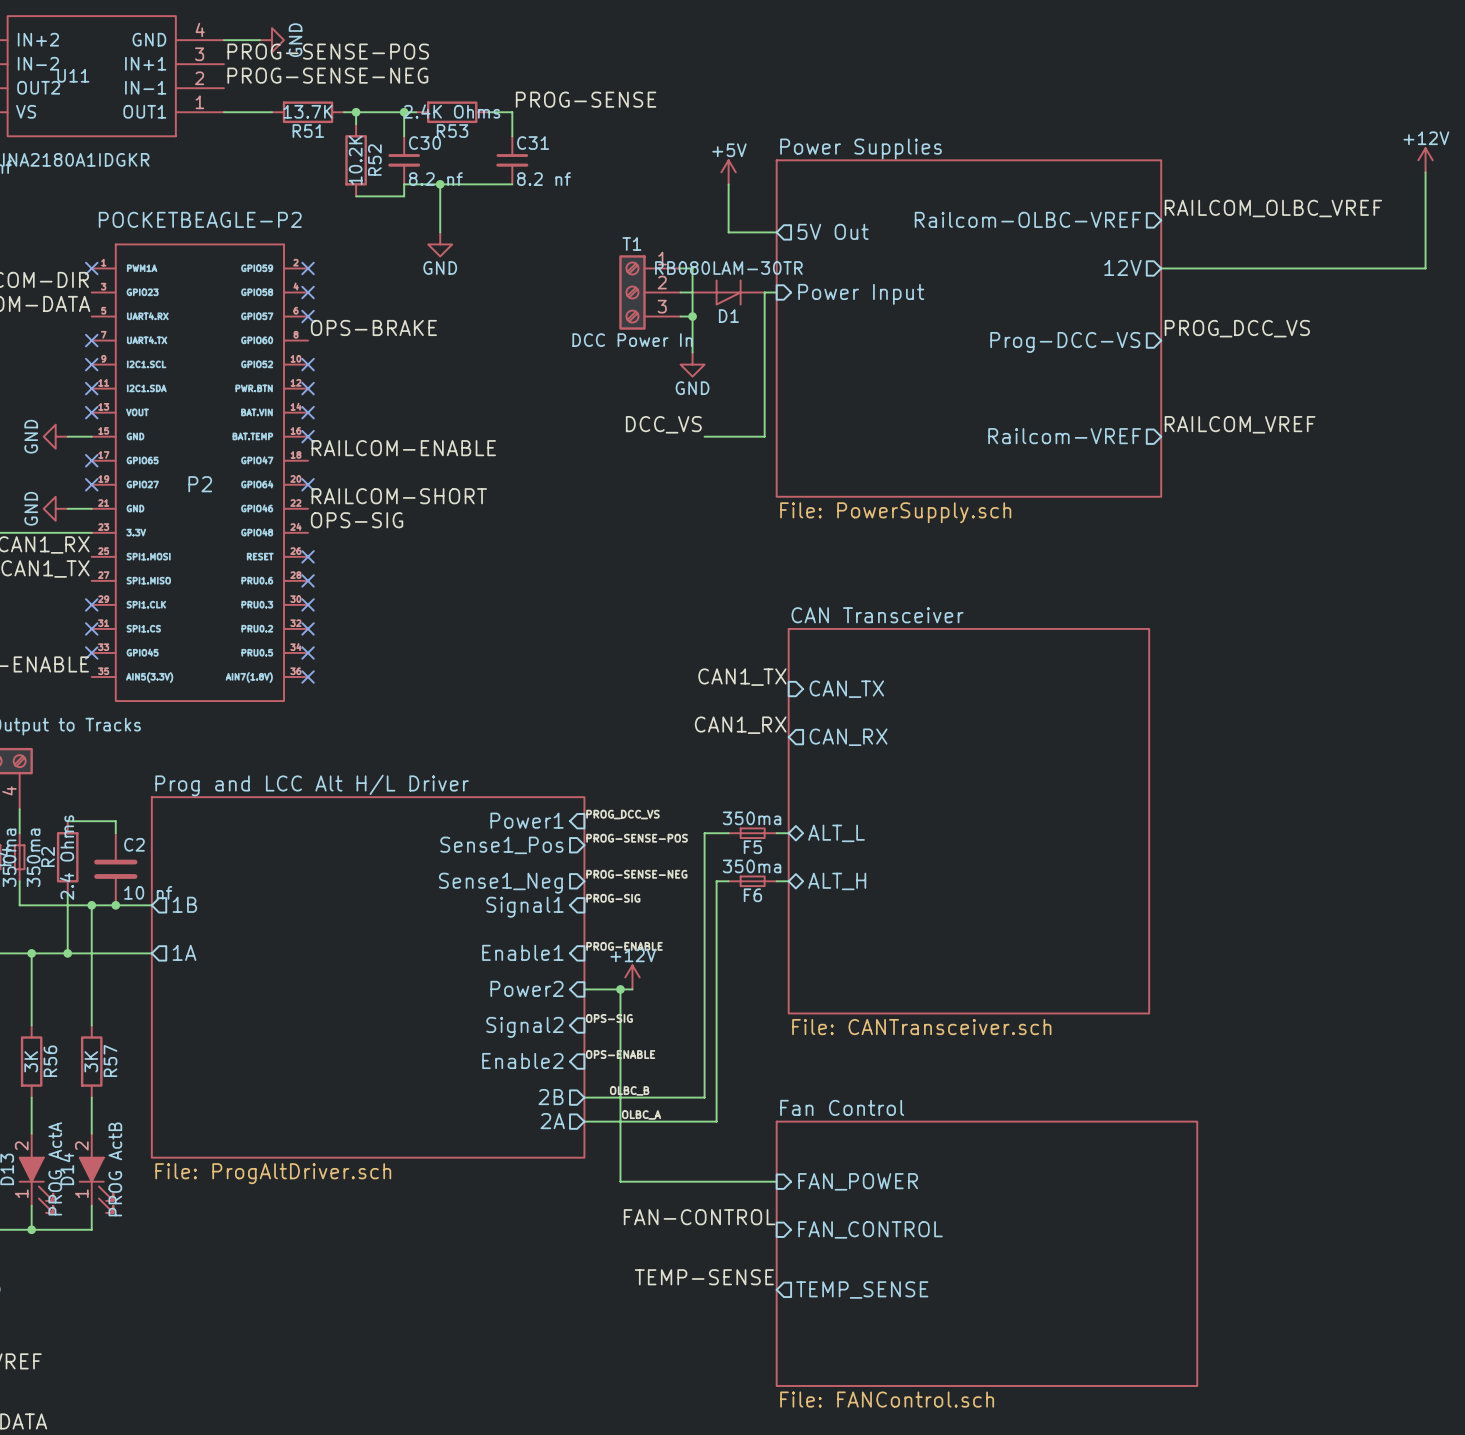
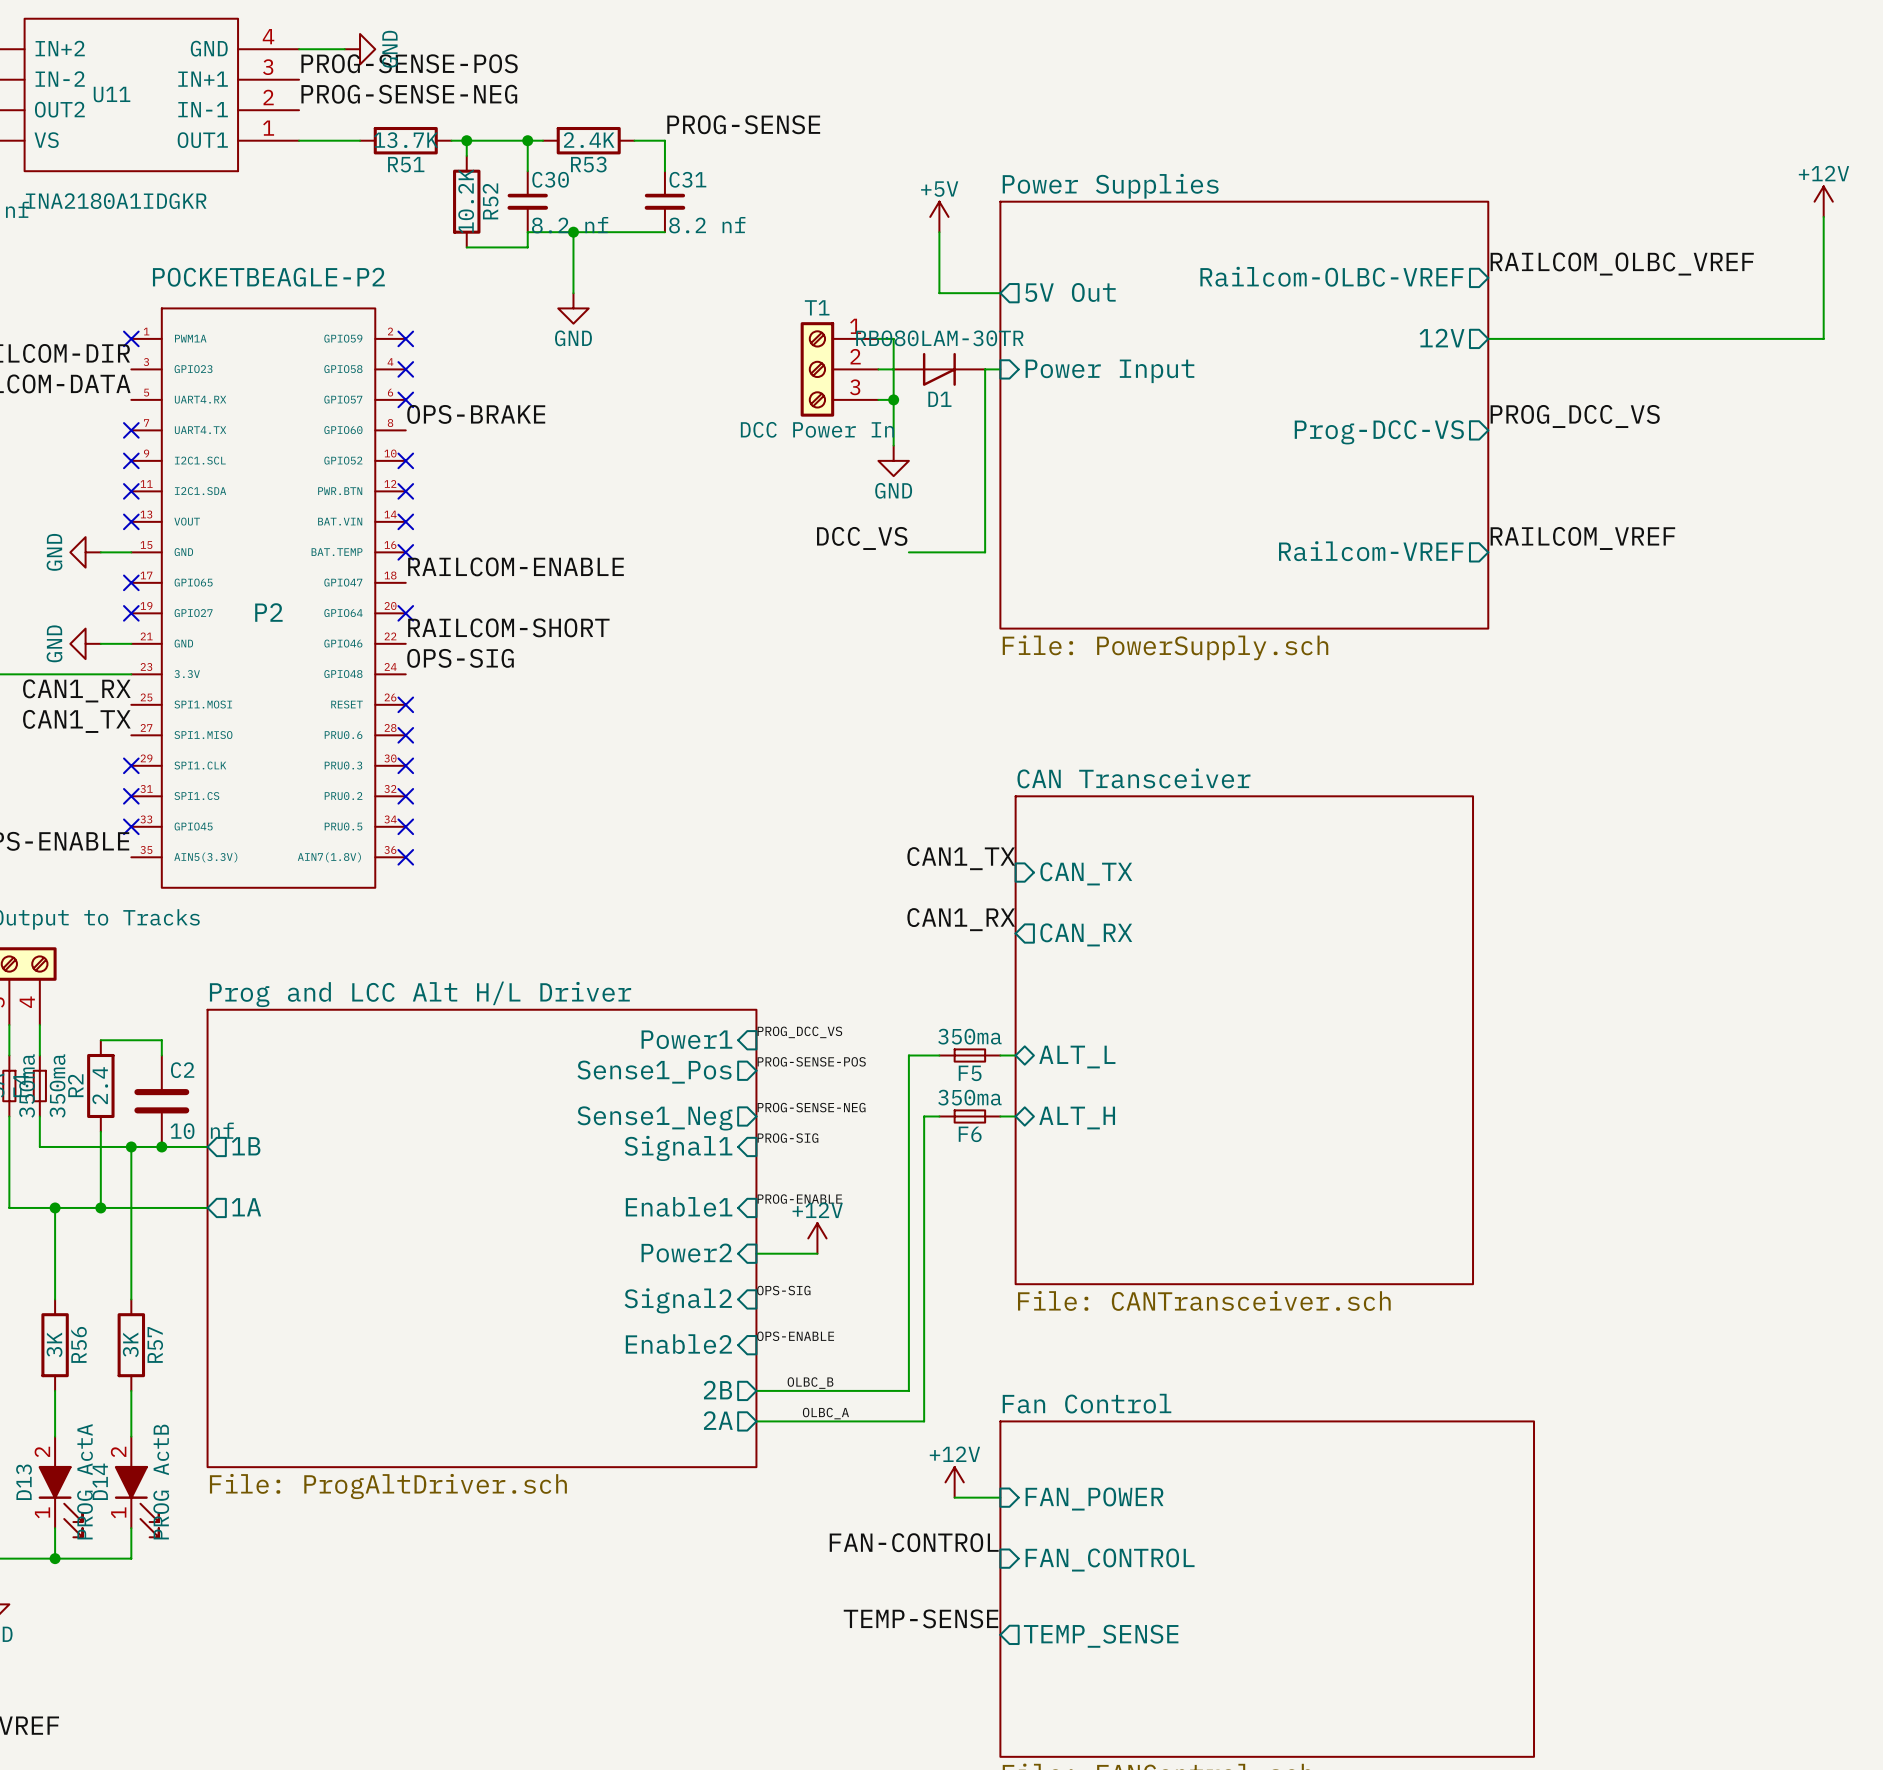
R53 value: 2.4K Ohms (451, 111) -> 2.4K (589, 140)
R2 value: 2.4 Ohms (66, 857) -> 2.4 (100, 1085)
wire: (620, 989) (620, 1181) (740, 1181) -> none
junction: (620, 989) -> none
power symbol: none -> +12V (954, 1482)

